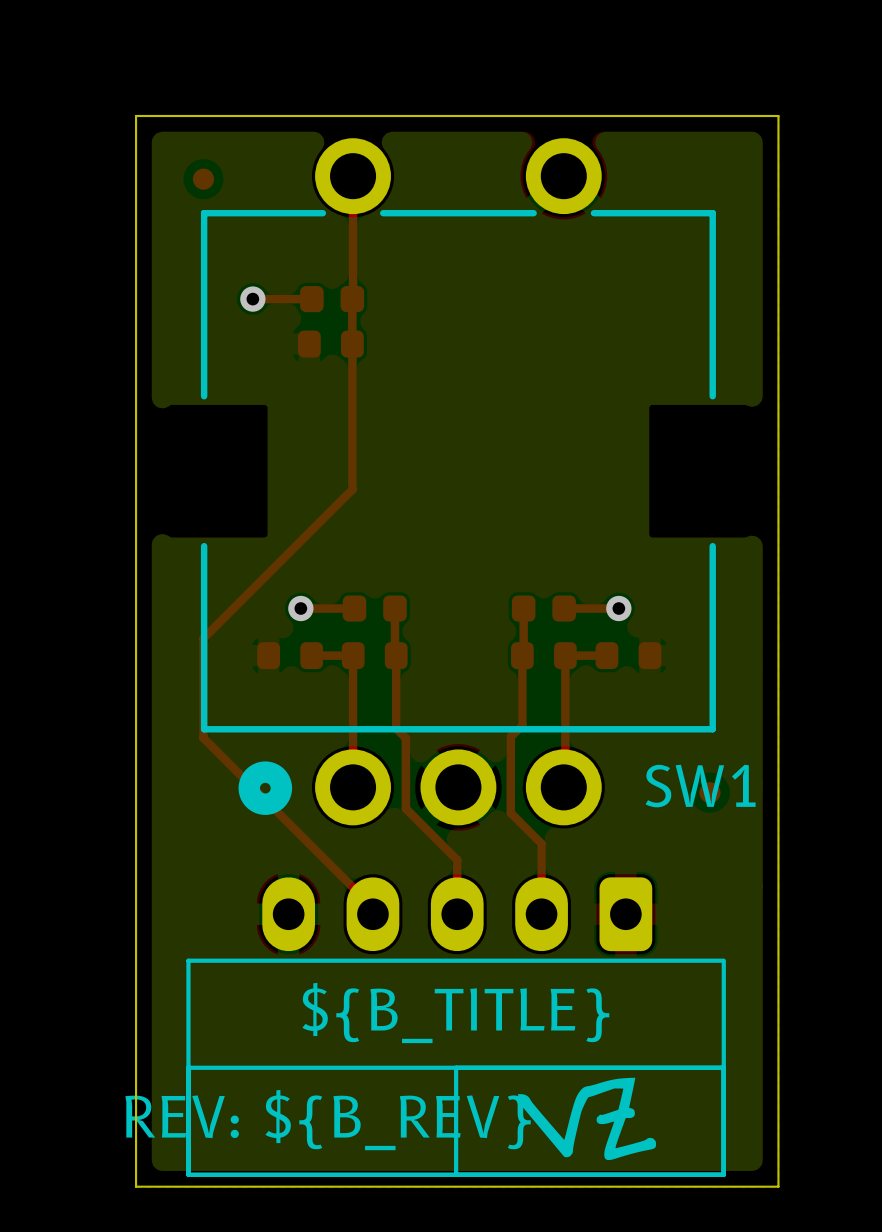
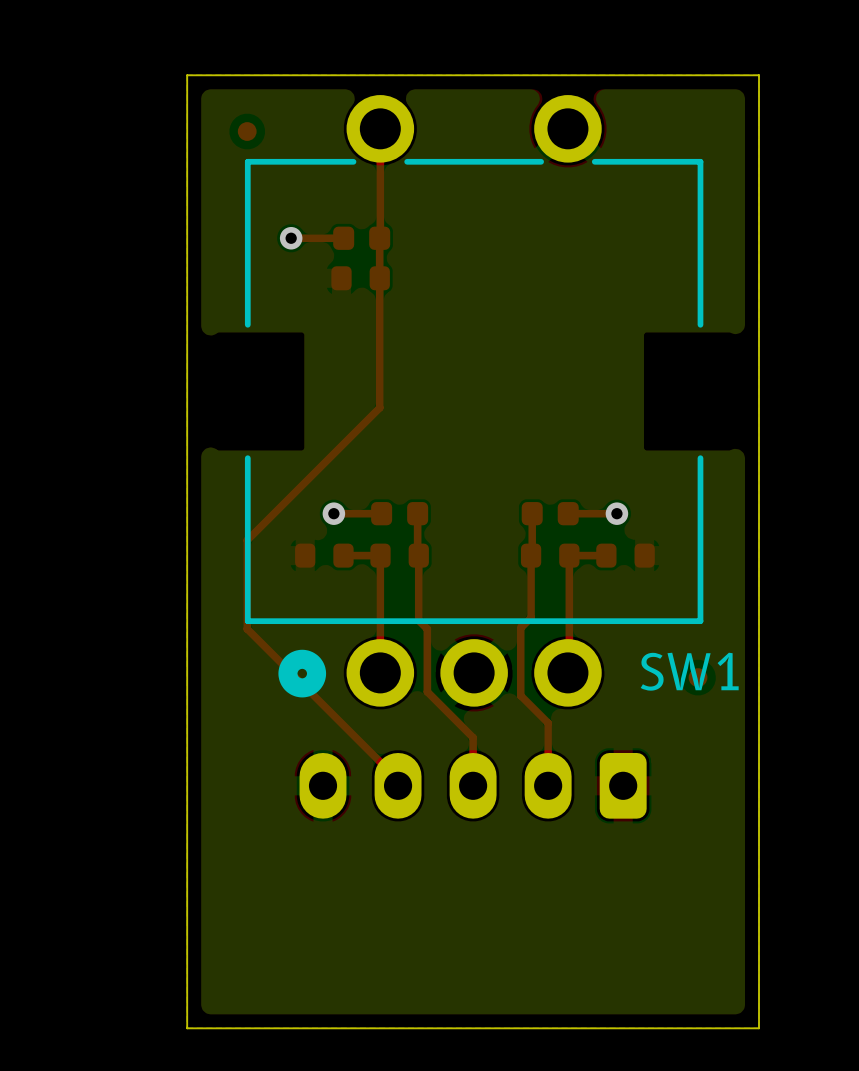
drawing: [186, 958, 726, 1177] -> none

